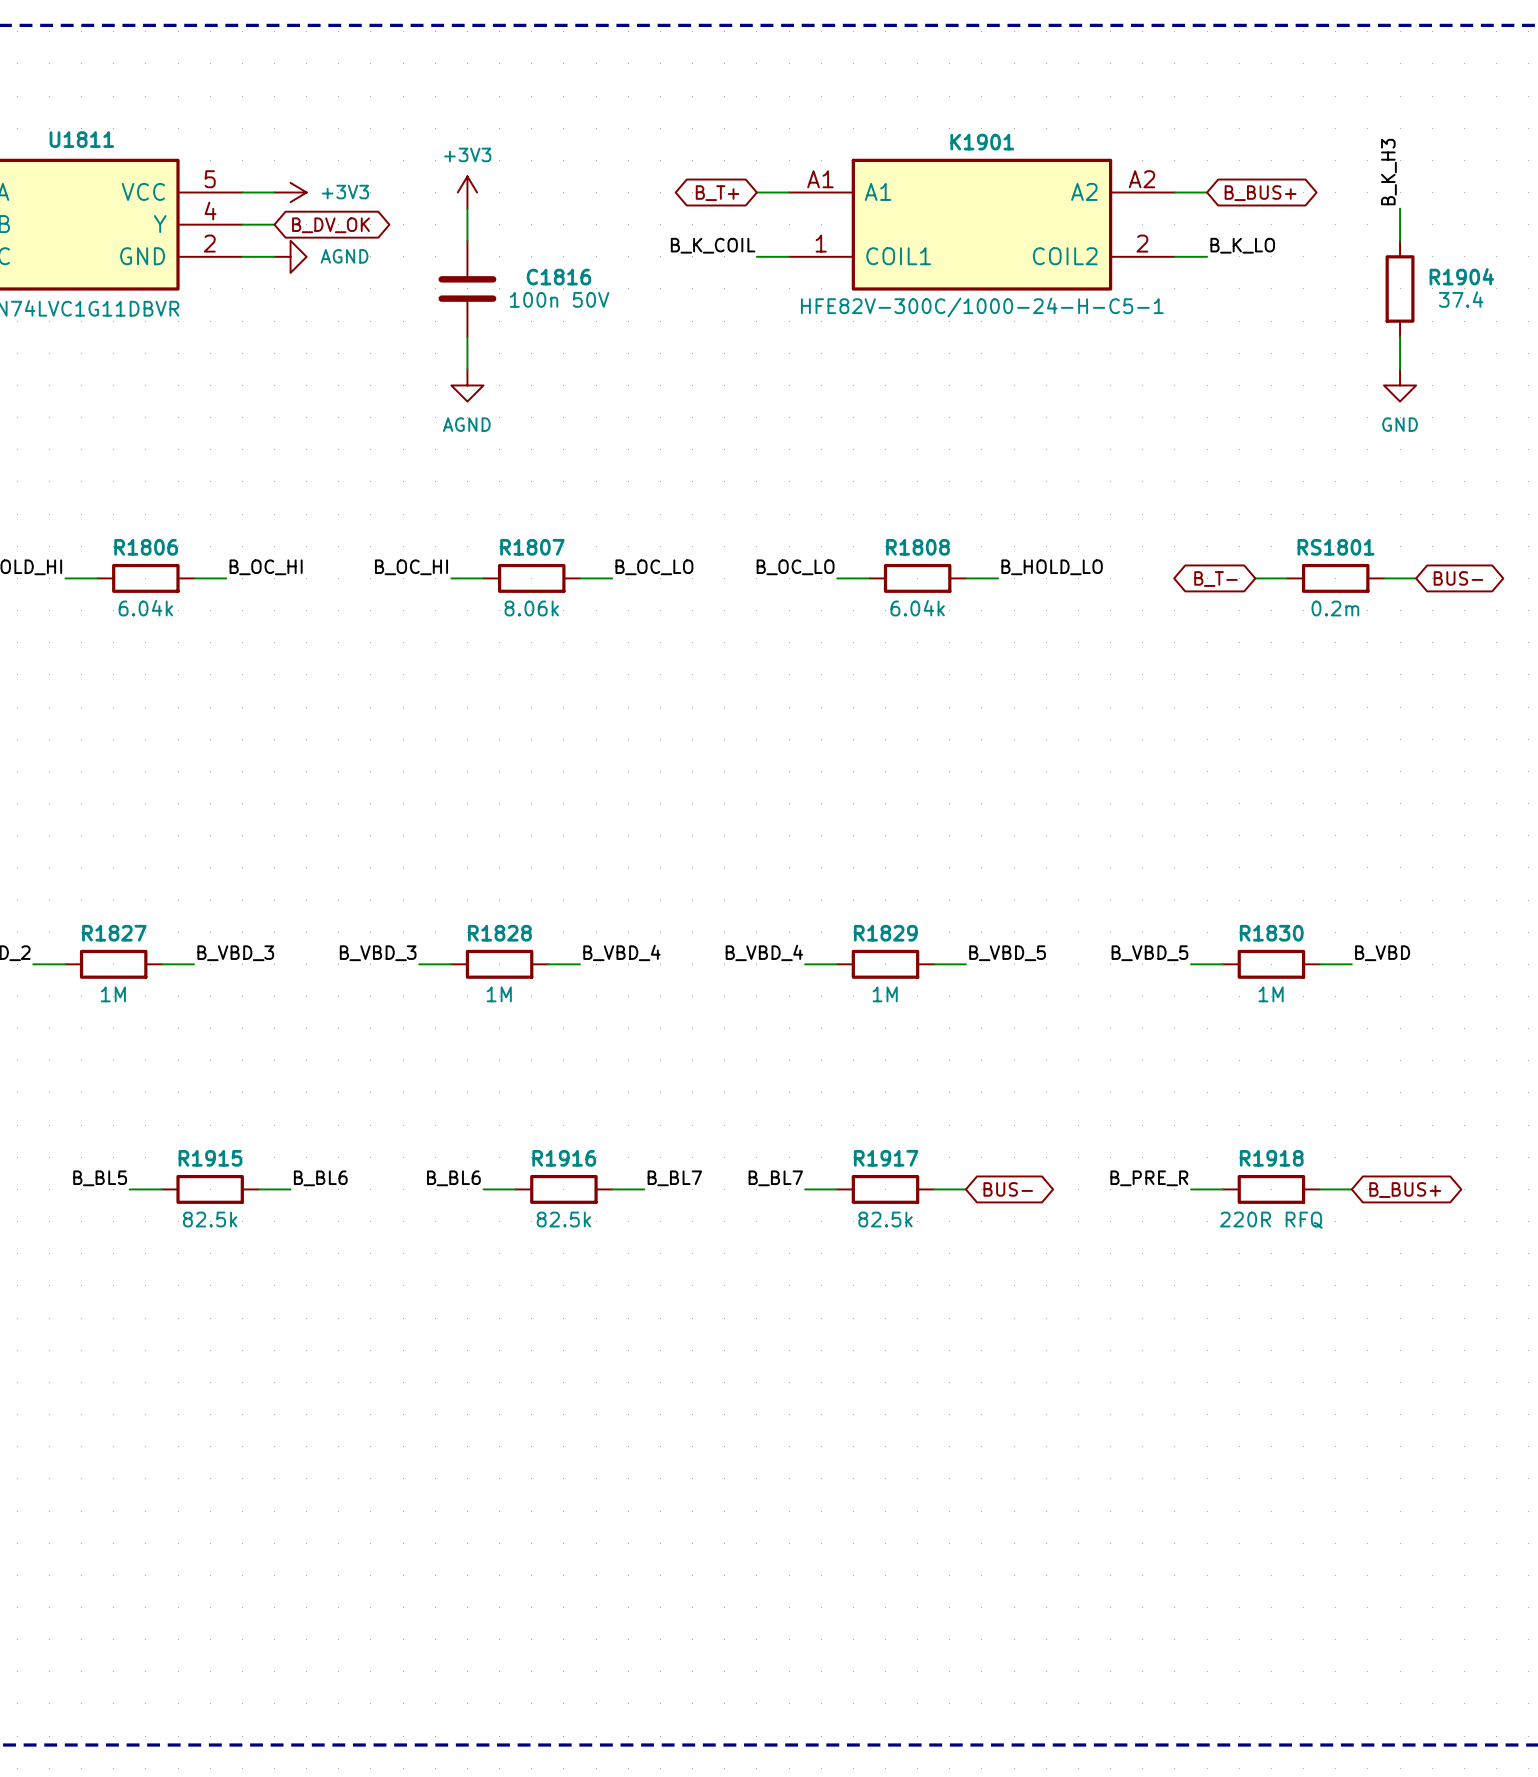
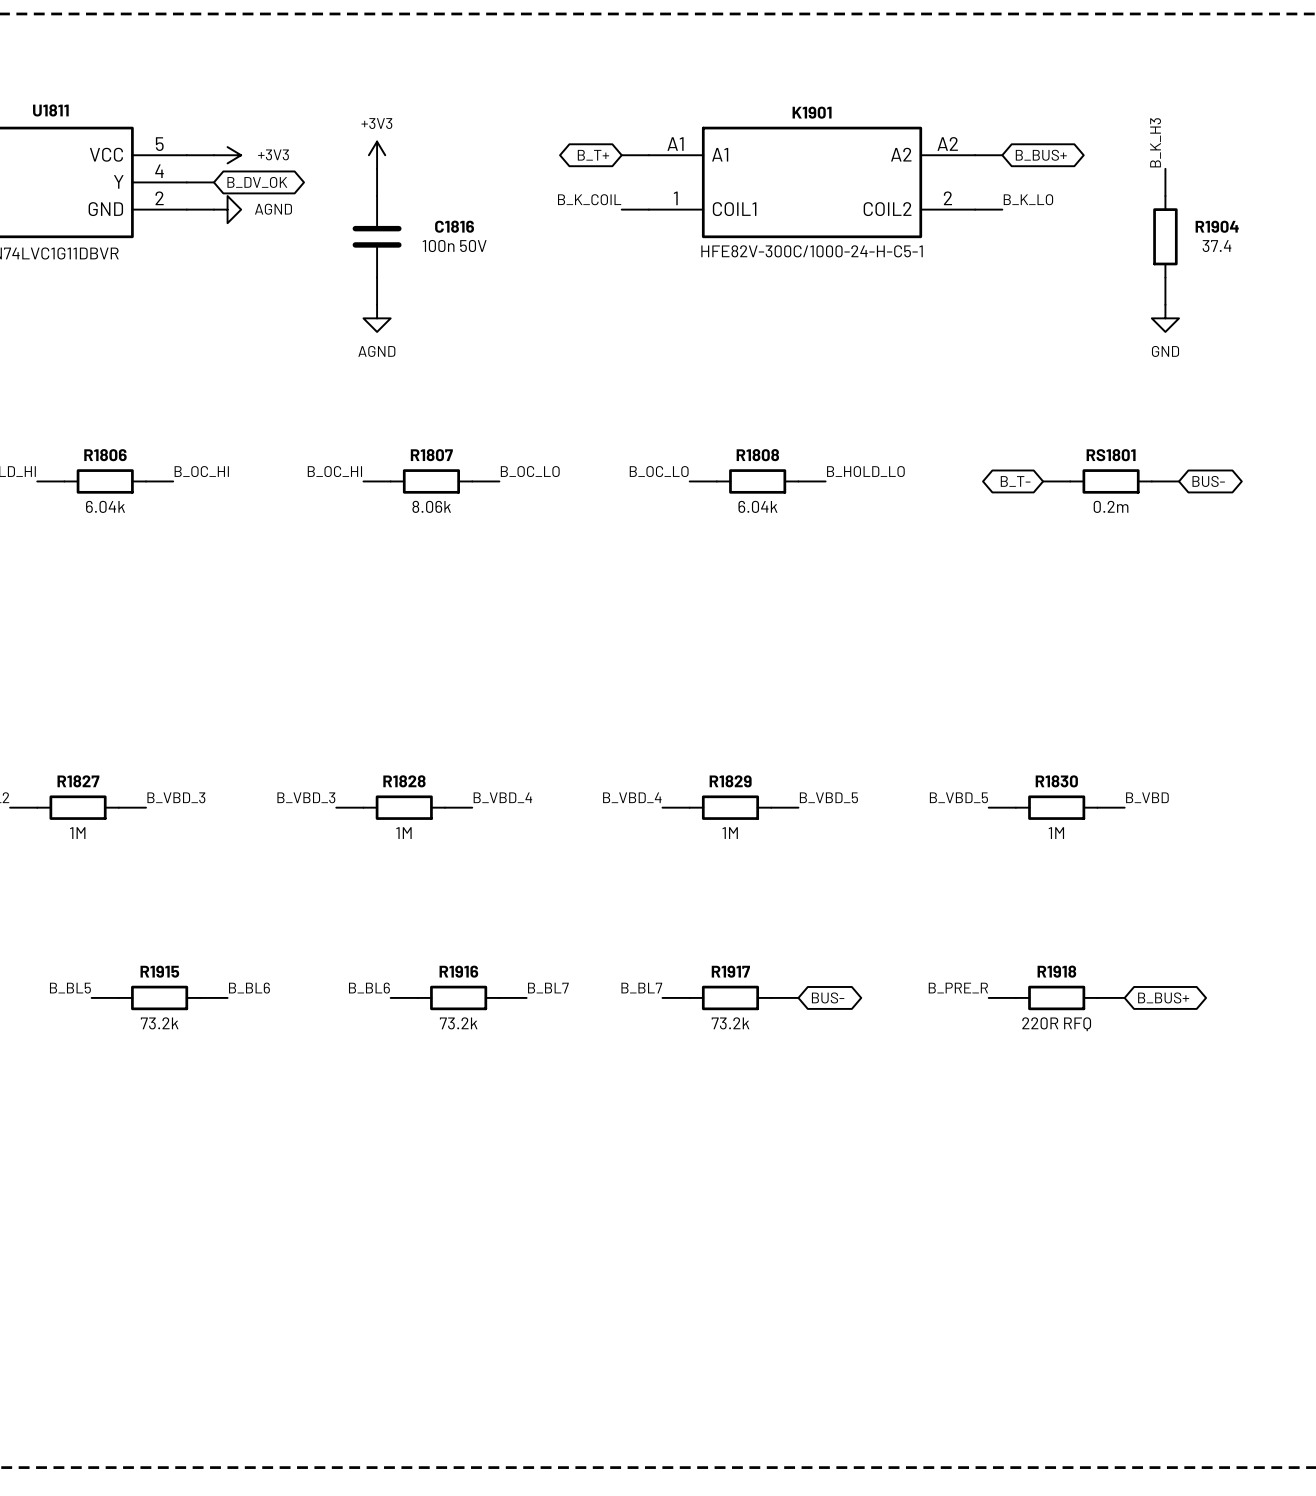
R1915 value: 82.5k (210, 1219) -> 73.2k (159, 1023)
R1916 value: 82.5k (563, 1219) -> 73.2k (458, 1023)
R1917 value: 82.5k (885, 1219) -> 73.2k (730, 1023)

